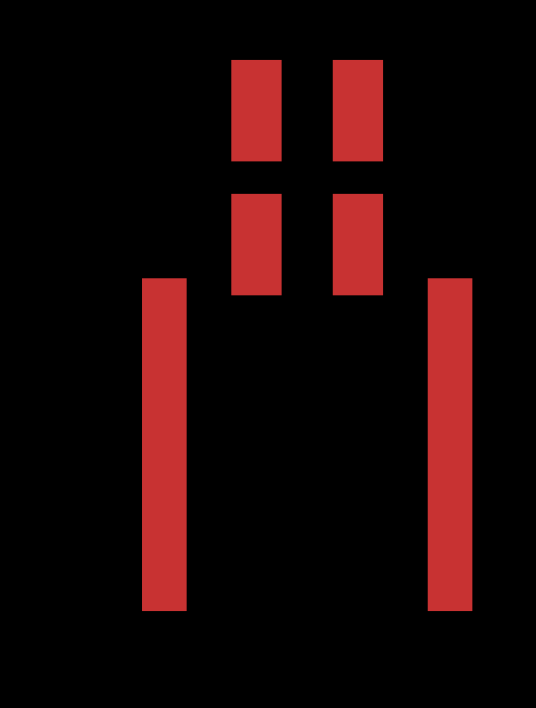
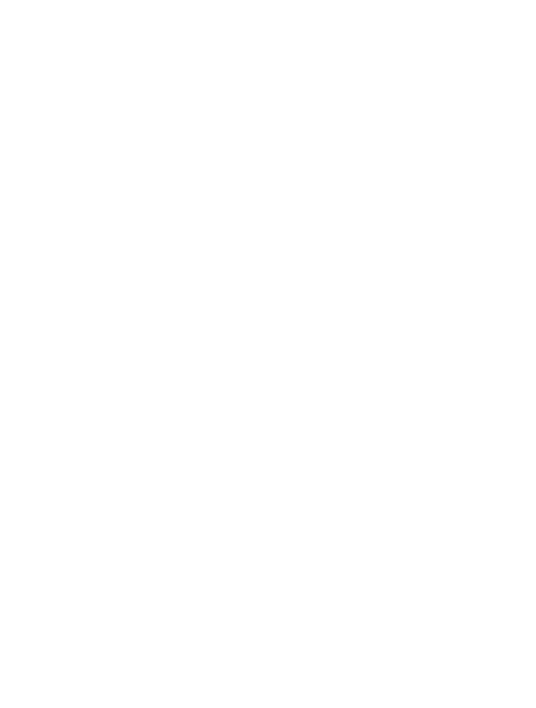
part: (307, 335) -> none

